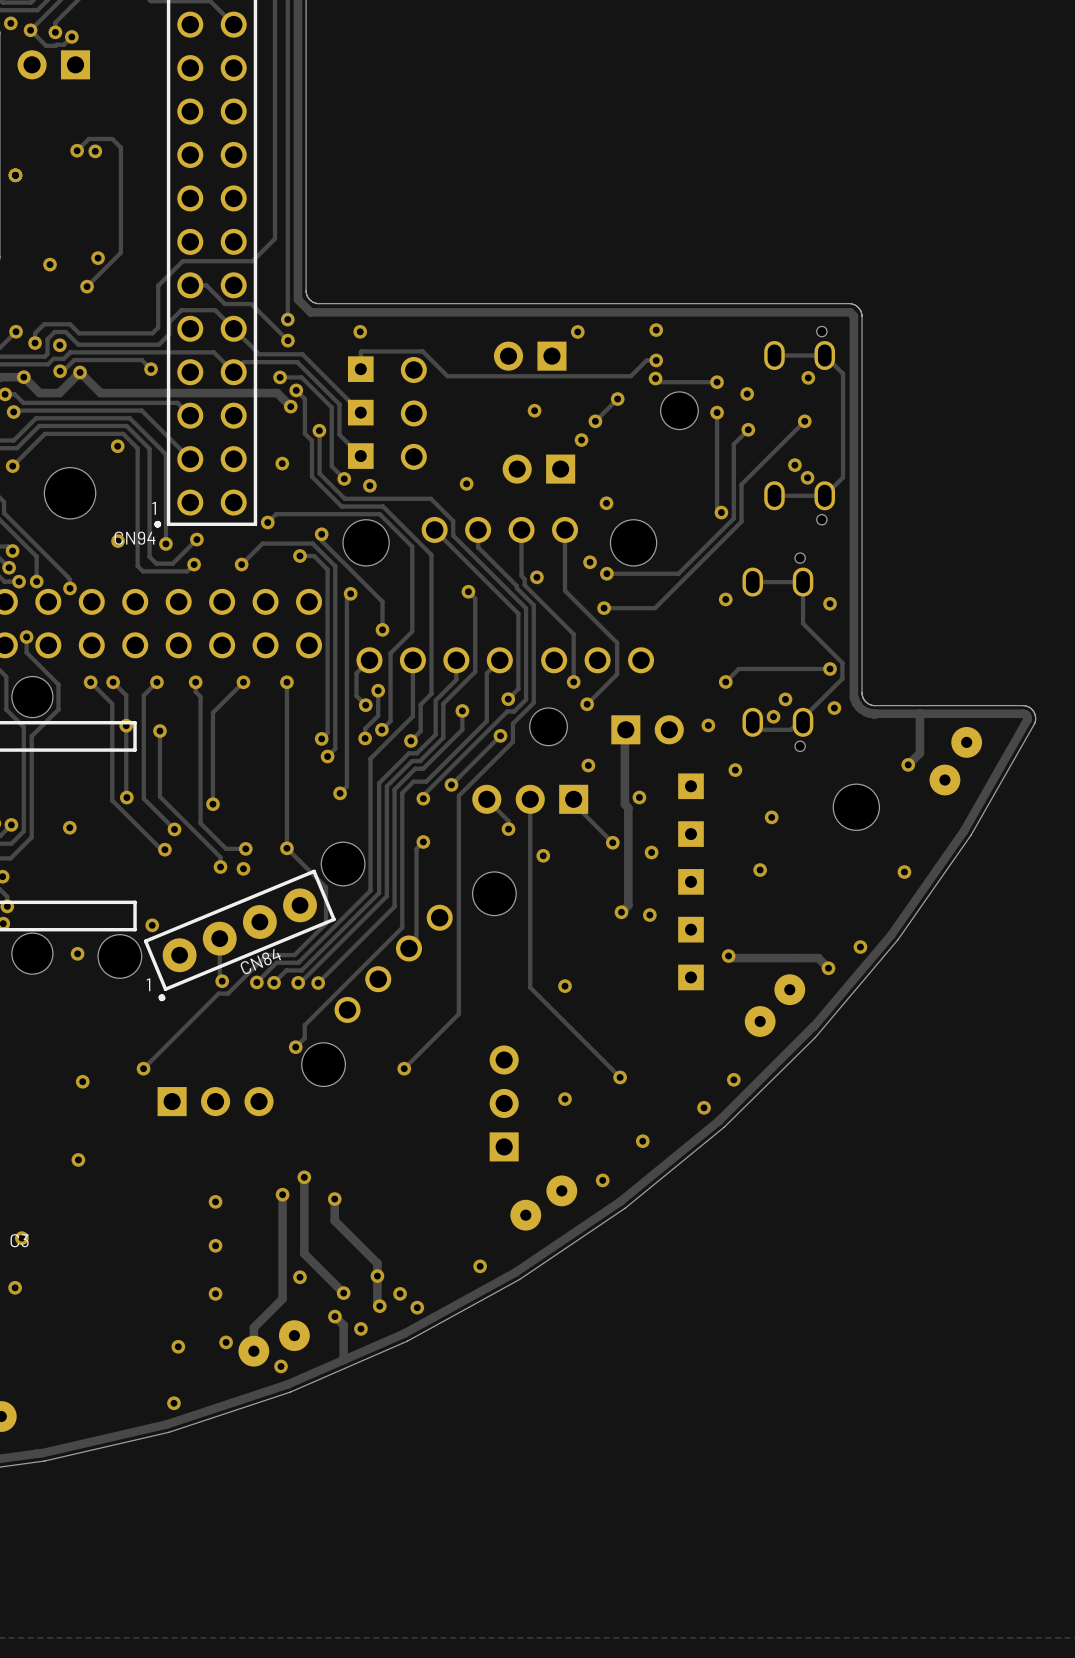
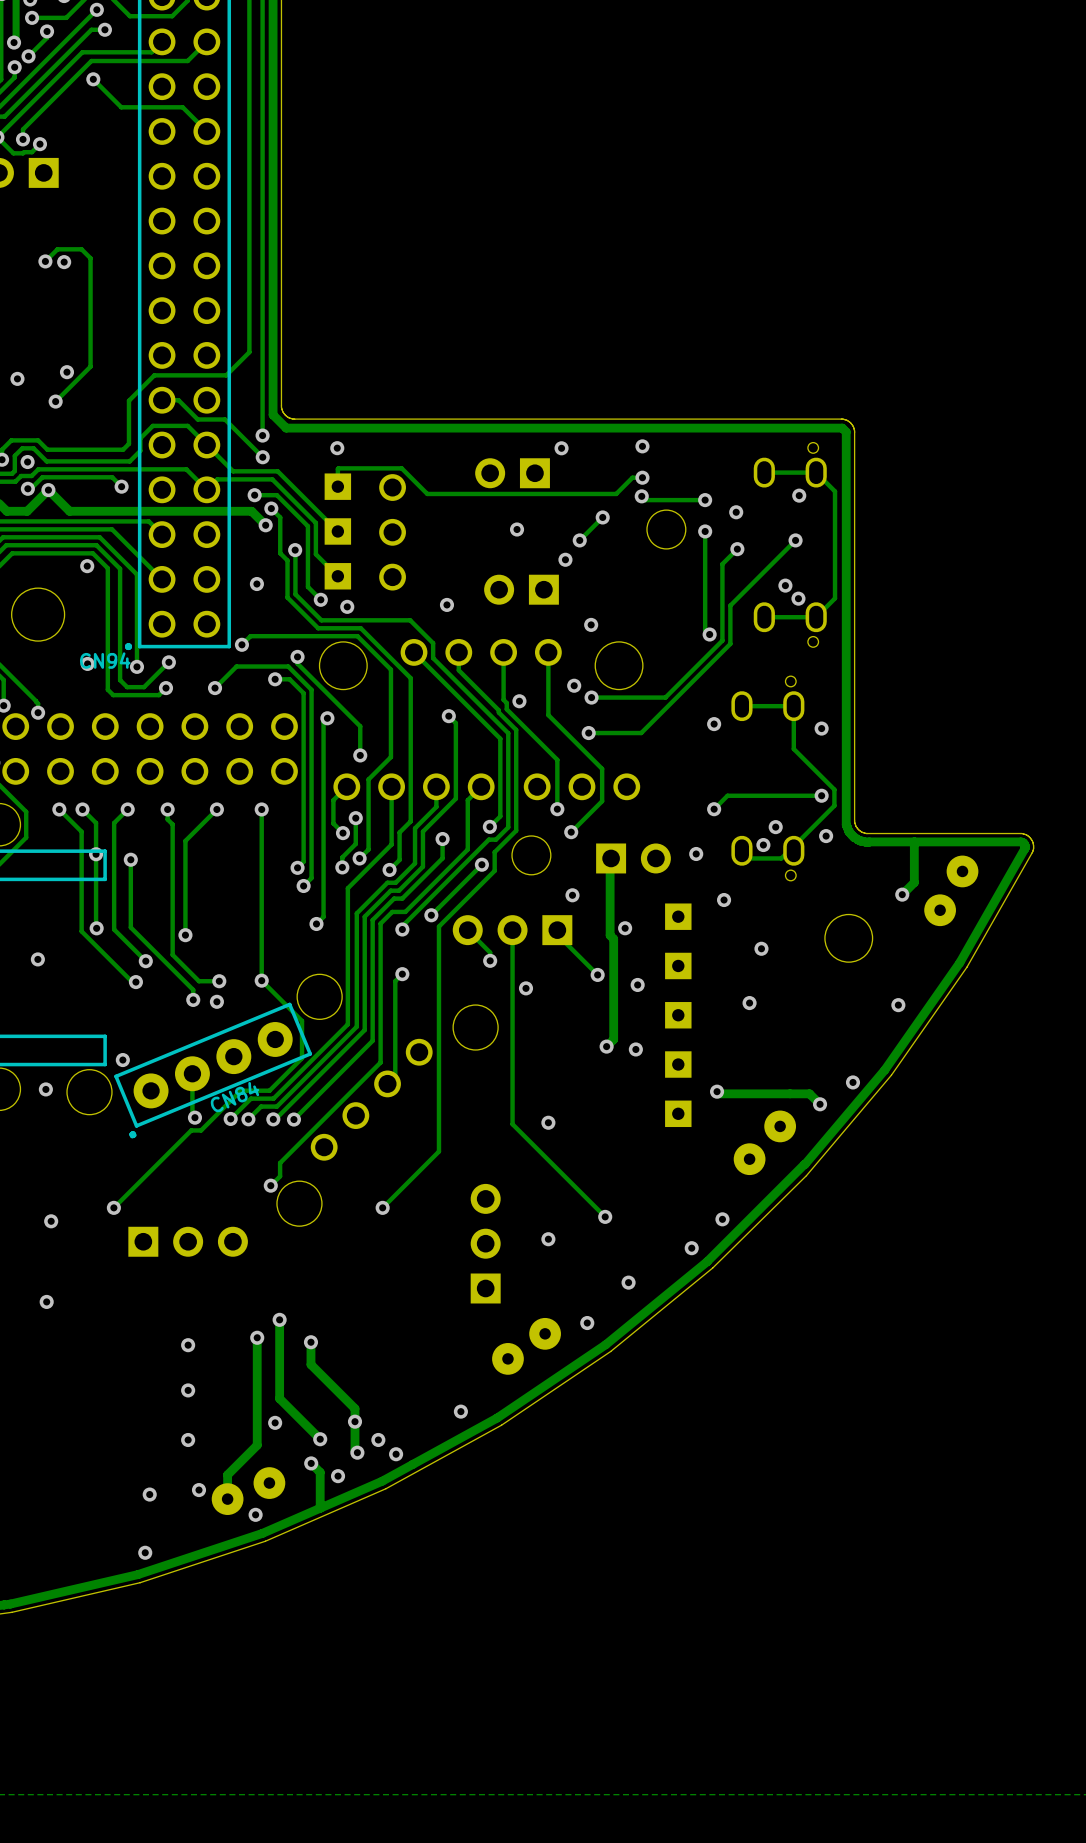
text: 1 (154, 508) -> none
text: 1 (148, 984) -> none

